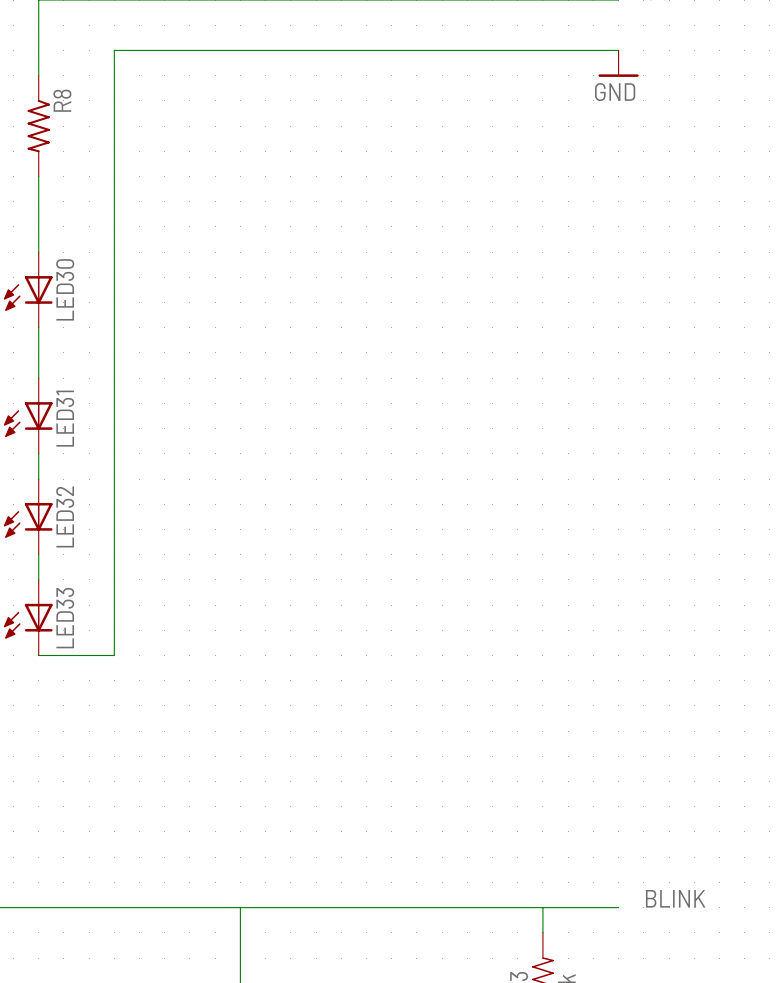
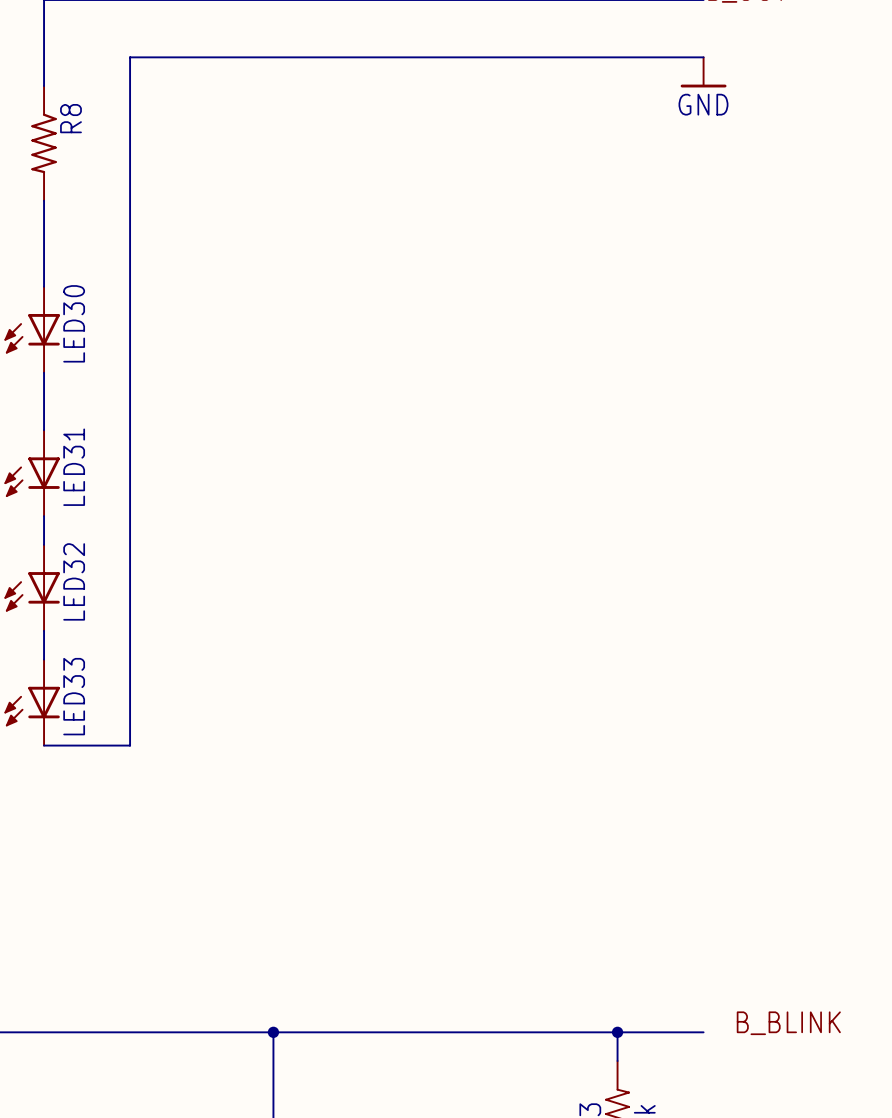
label: BLINK (675, 898) -> B_BLINK (788, 1023)
junction: none -> (273, 1032)
junction: none -> (617, 1032)

